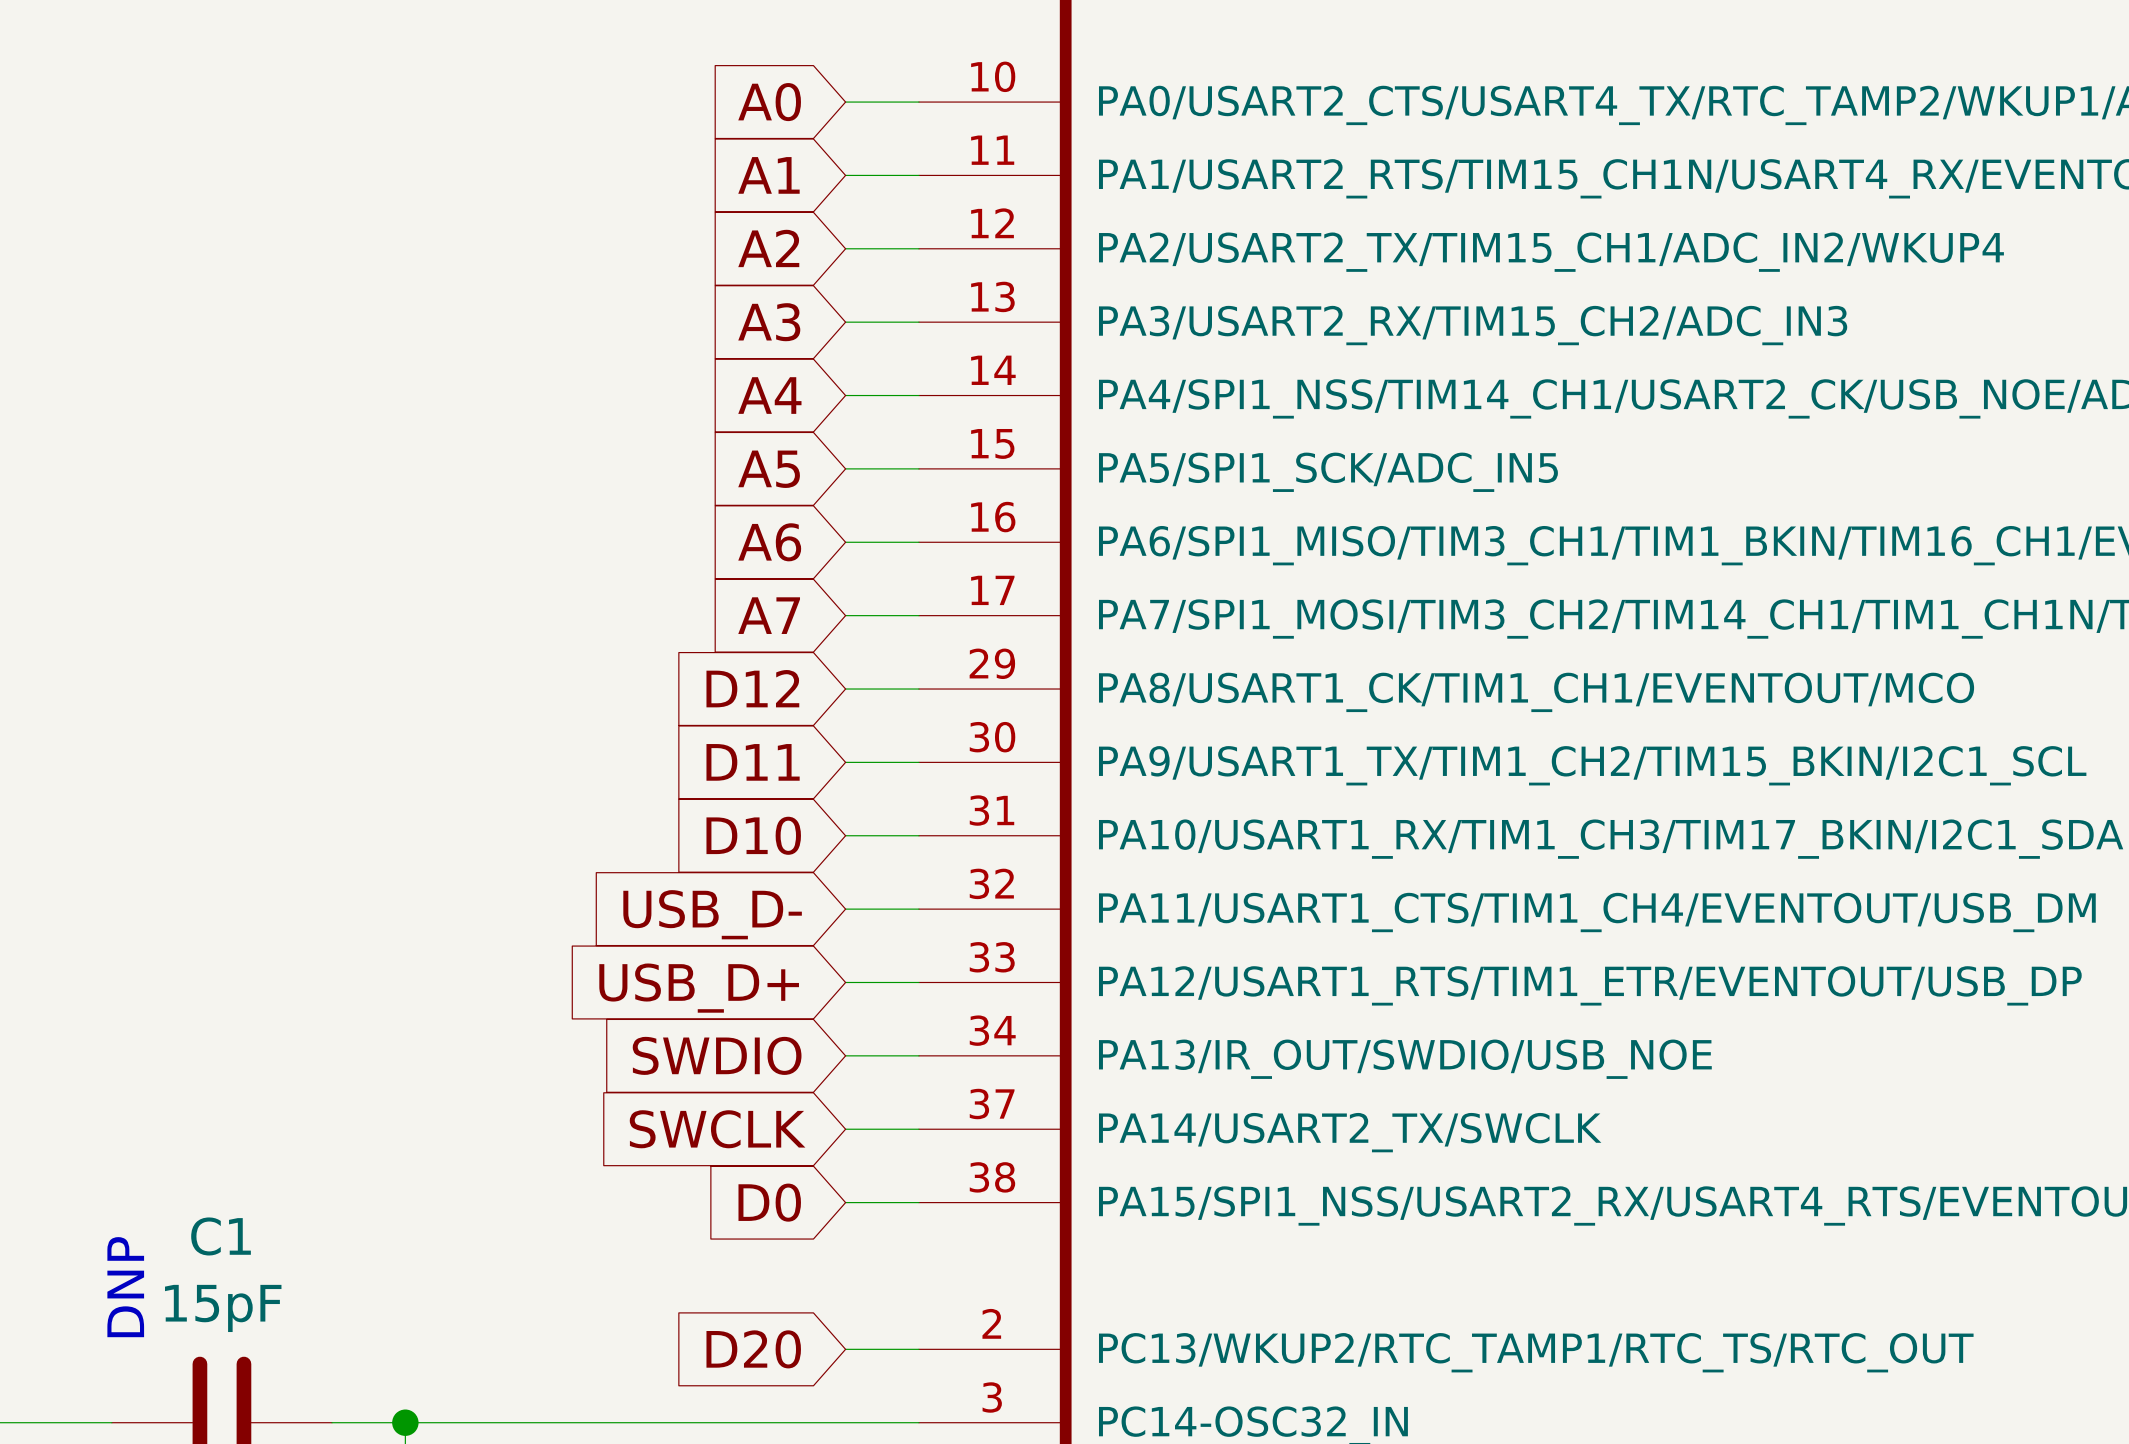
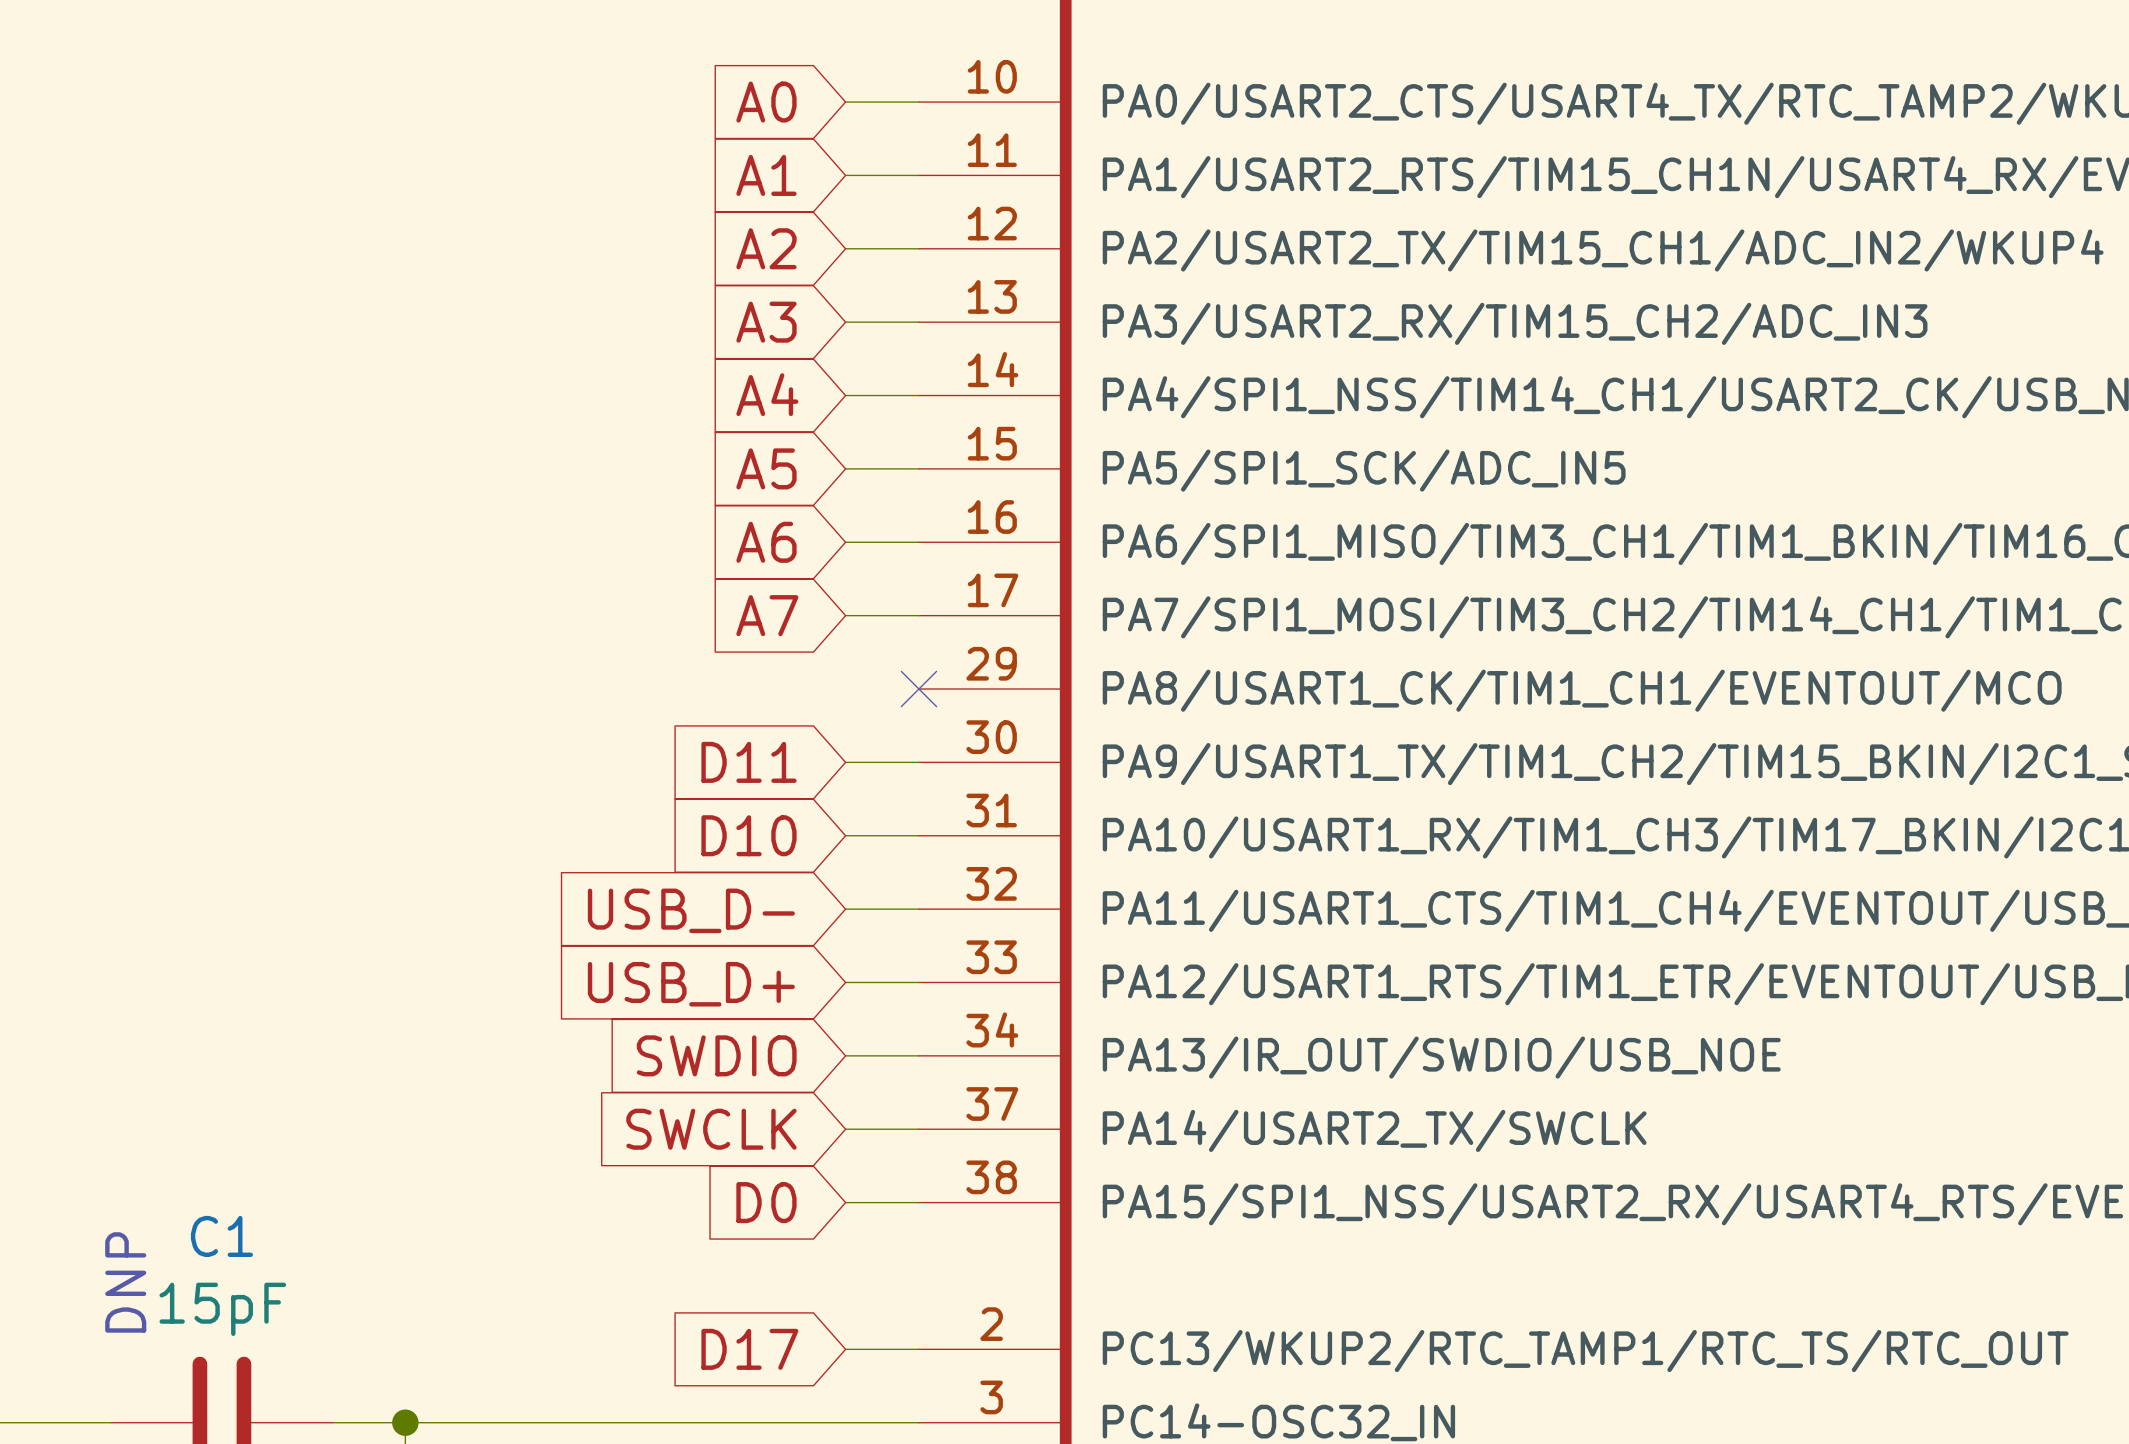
global label: D12 (752, 688) -> none
wire: (845, 689) (918, 689) -> none
no-connect mark: none -> (918, 689)
global label: D20 (753, 1349) -> D17 (749, 1349)

